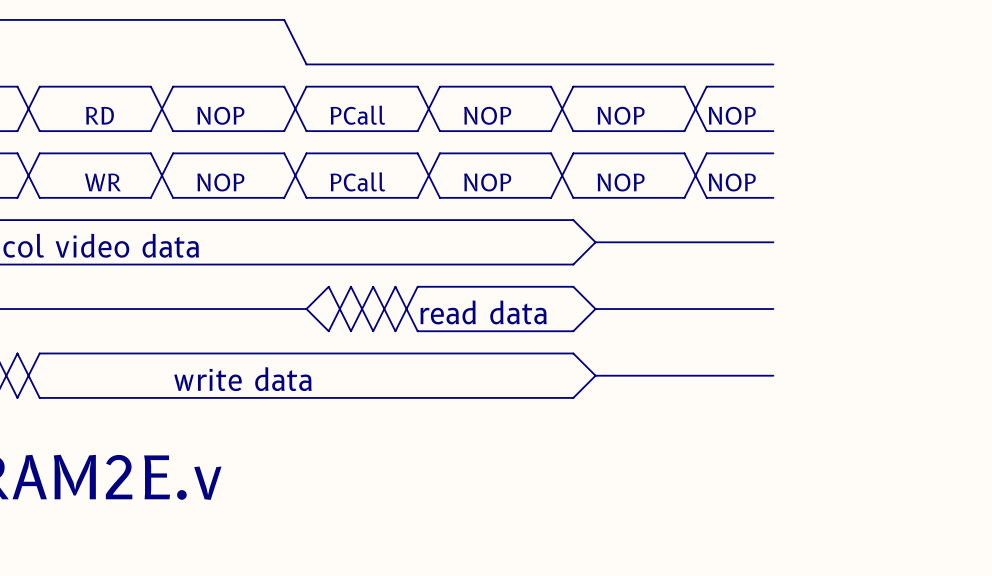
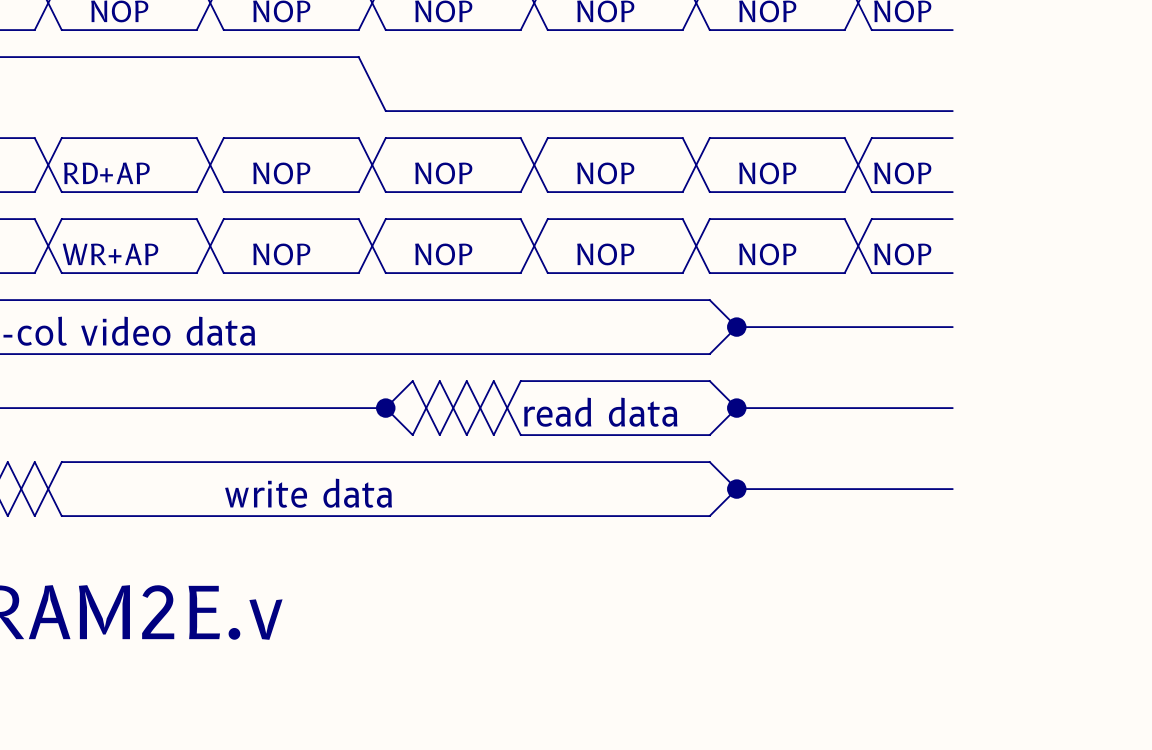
text: none -> RD+AP (106, 173)
text: RD (99, 115) -> none
text: PCall (357, 115) -> NOP (443, 173)
text: PCall (357, 181) -> NOP (443, 254)
text: none -> WR+AP (110, 254)
text: WR (102, 182) -> none
junction: none -> (736, 327)
junction: none -> (385, 408)
junction: none -> (736, 408)
junction: none -> (736, 489)

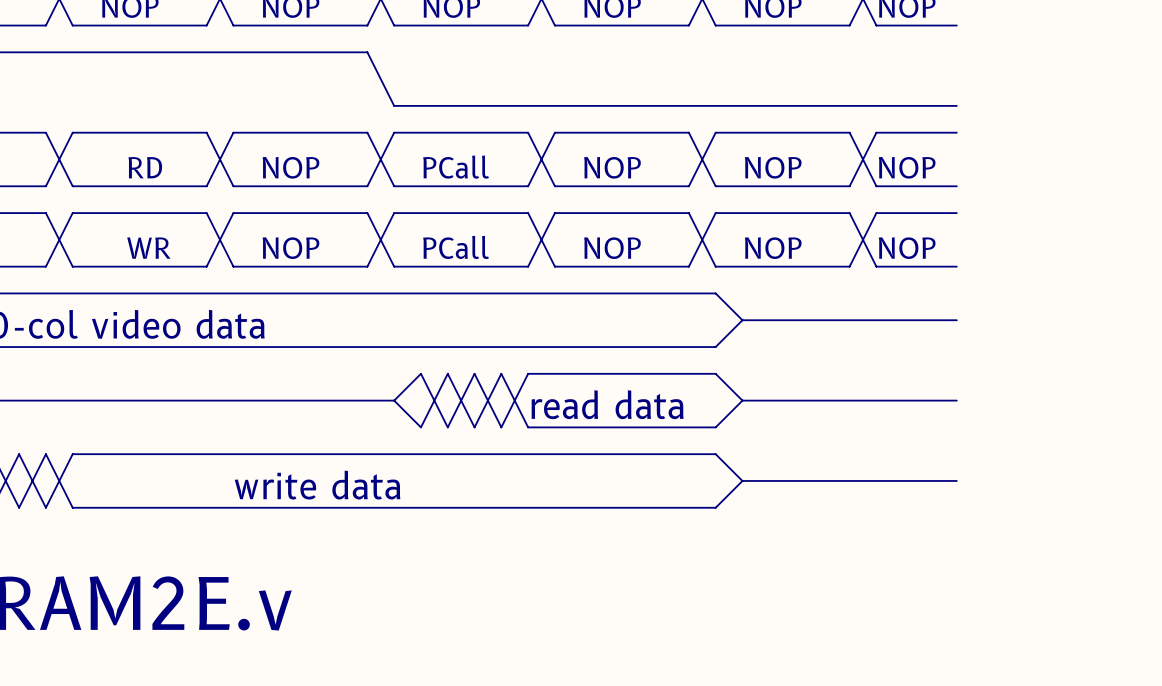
text: RD+AP (106, 173) -> none
text: none -> RD (145, 167)
text: NOP (443, 173) -> PCall (456, 167)
text: WR+AP (110, 254) -> none
text: none -> WR (148, 248)
text: NOP (443, 254) -> PCall (456, 247)
junction: (736, 327) -> none
junction: (385, 408) -> none
junction: (736, 408) -> none
junction: (736, 489) -> none

